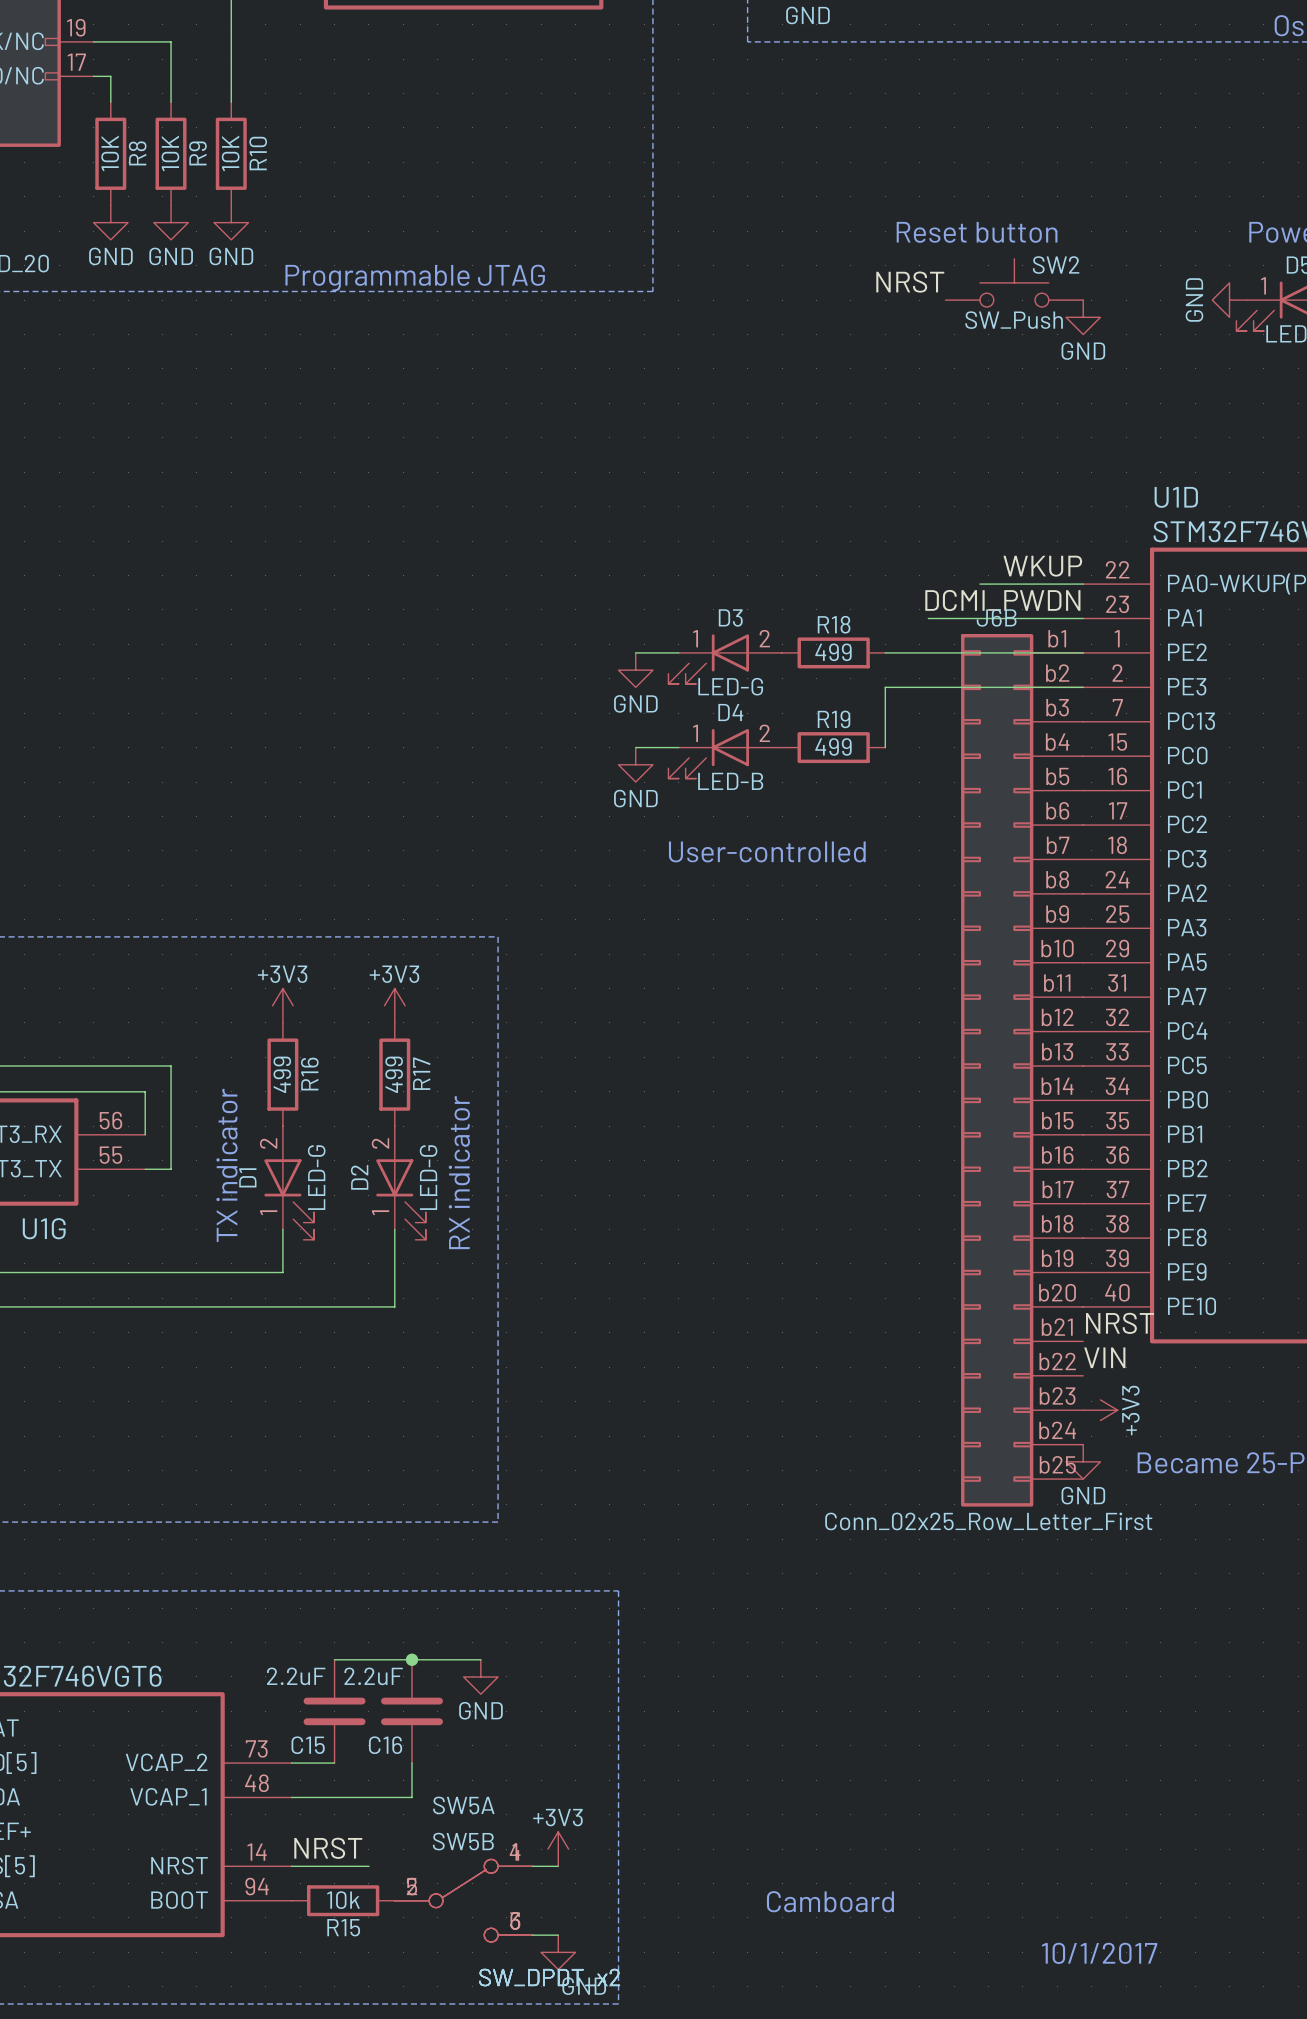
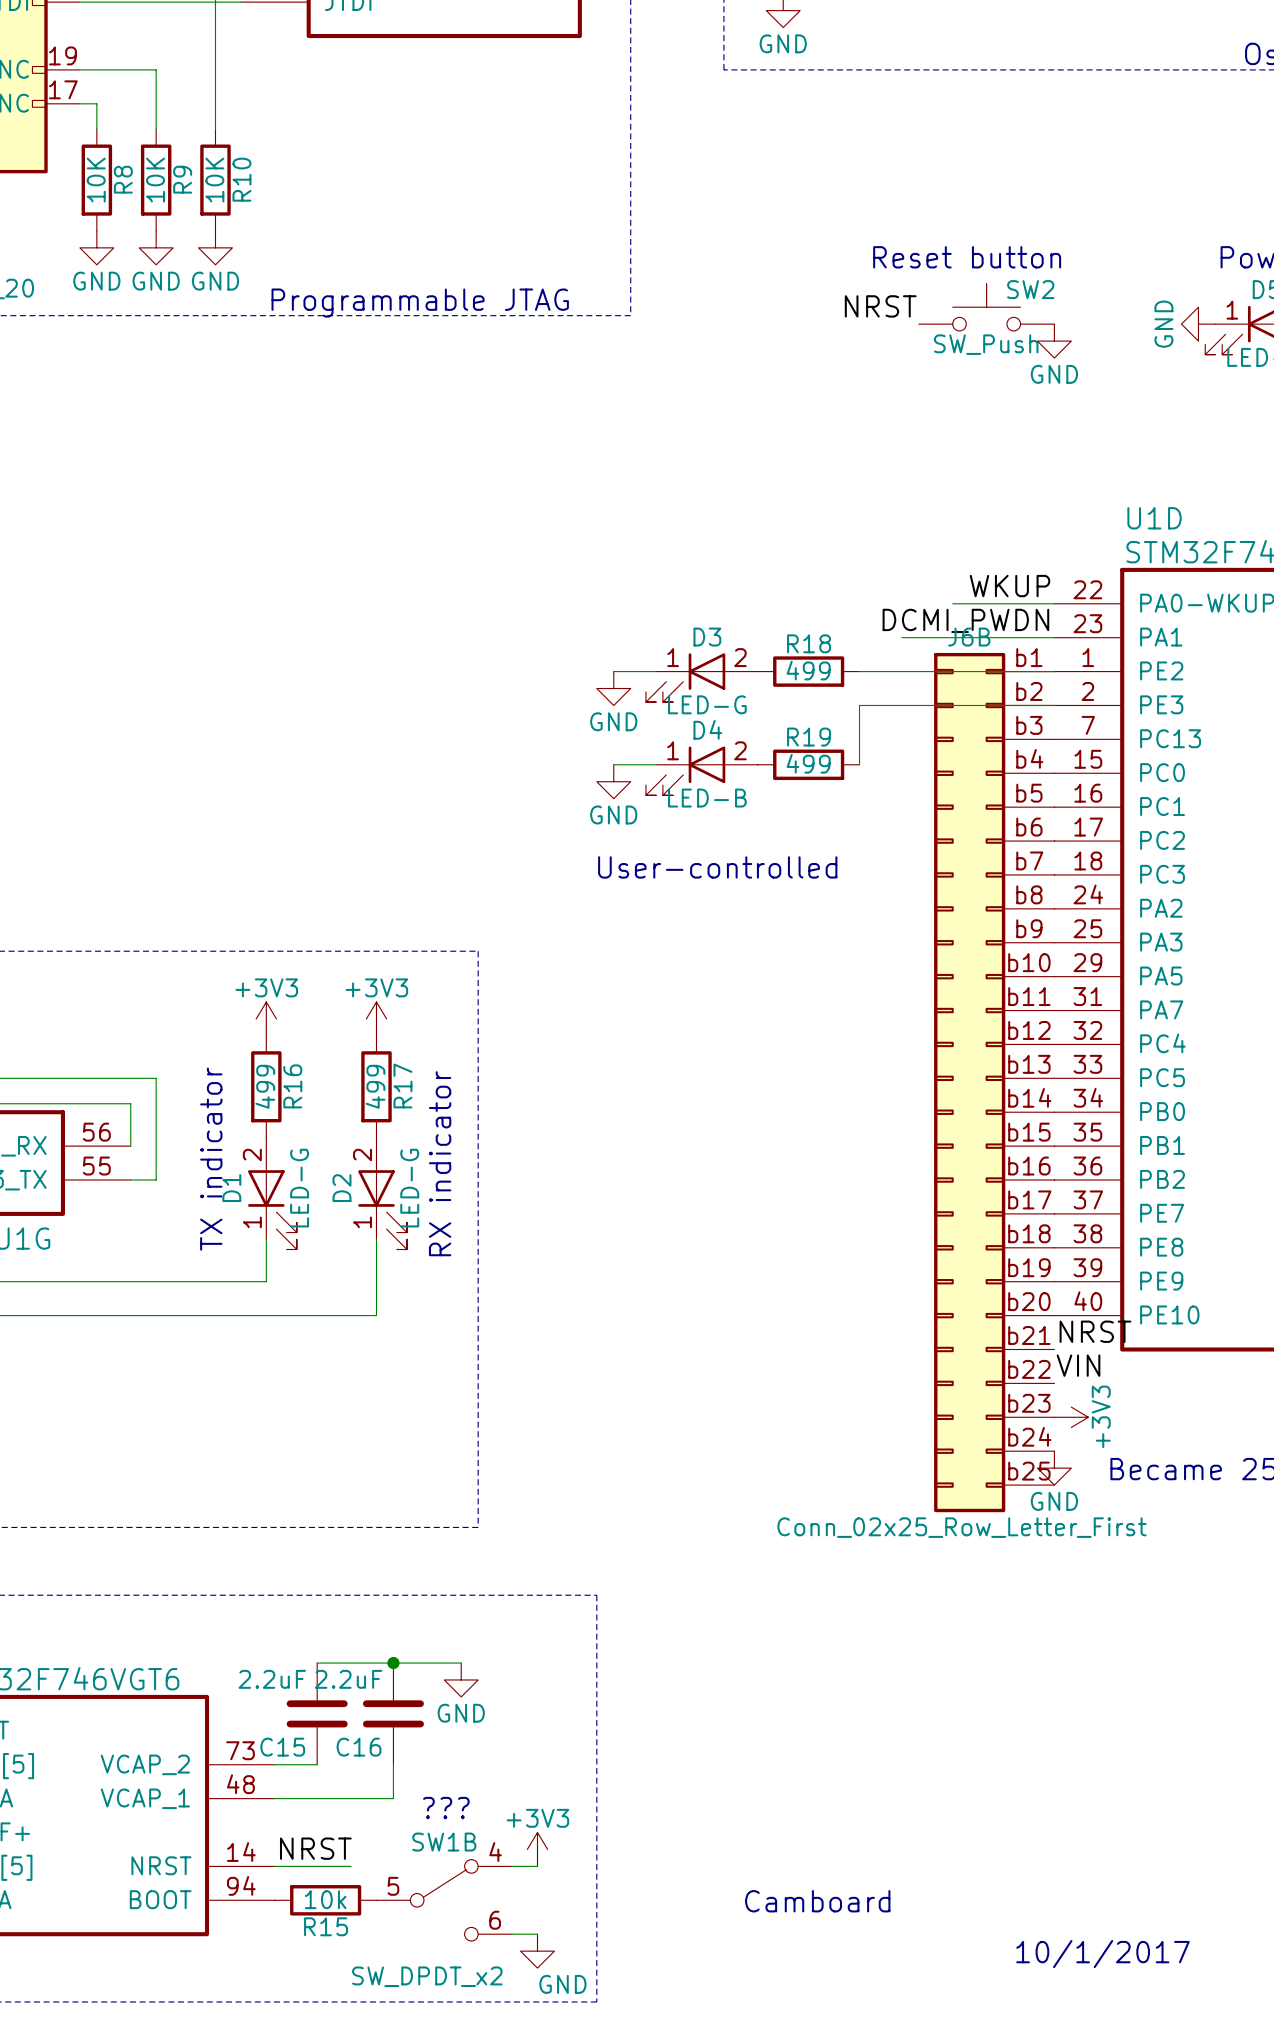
text: none -> ??? (446, 1808)
SW5B name: SW5B (463, 1841) -> SW1B (444, 1842)
SW5A: SW_DPDT_x2 (463, 1900) -> none
SW5B value position: SW_DPDT_x2 (549, 1977) -> SW_DPDT_x2 (427, 1976)

